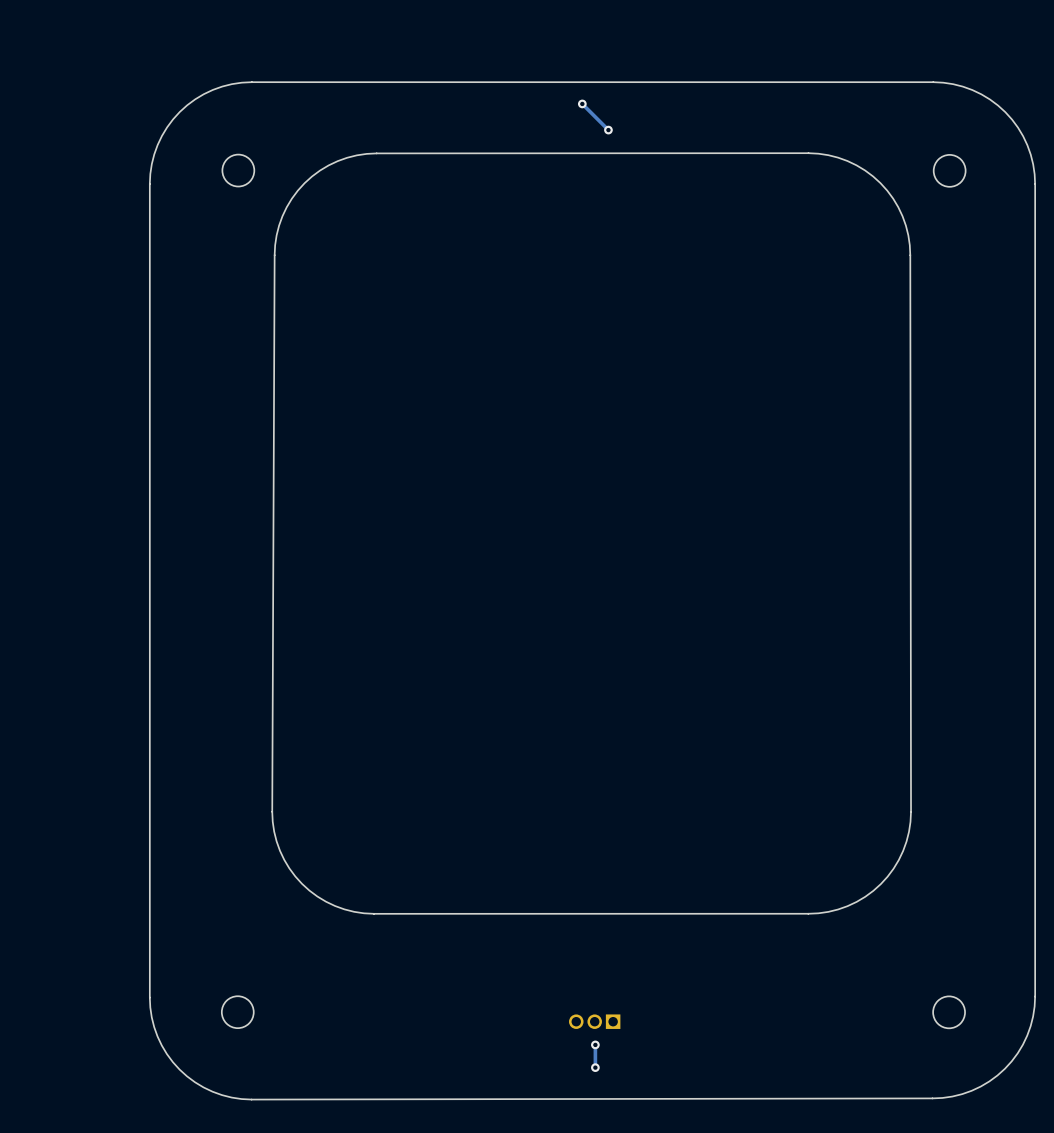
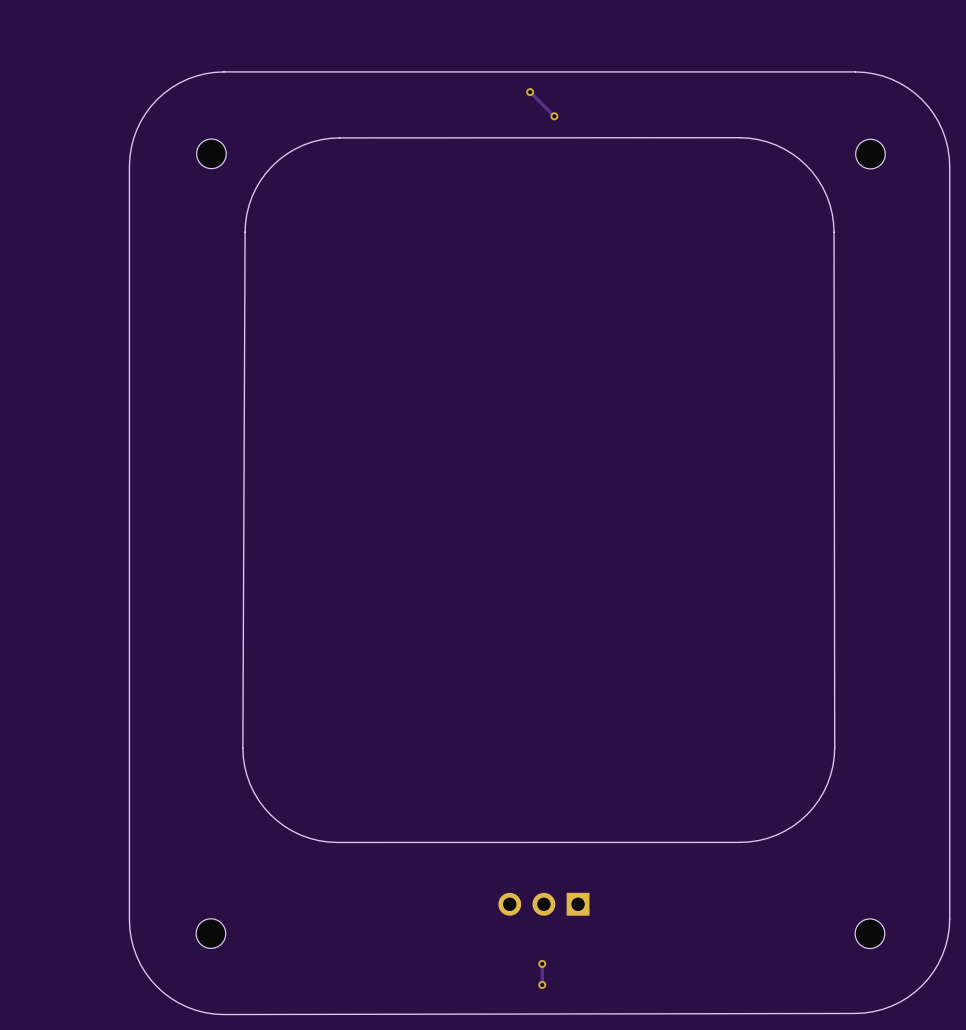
part: none -> (543, 904)
part: (594, 1021) -> none

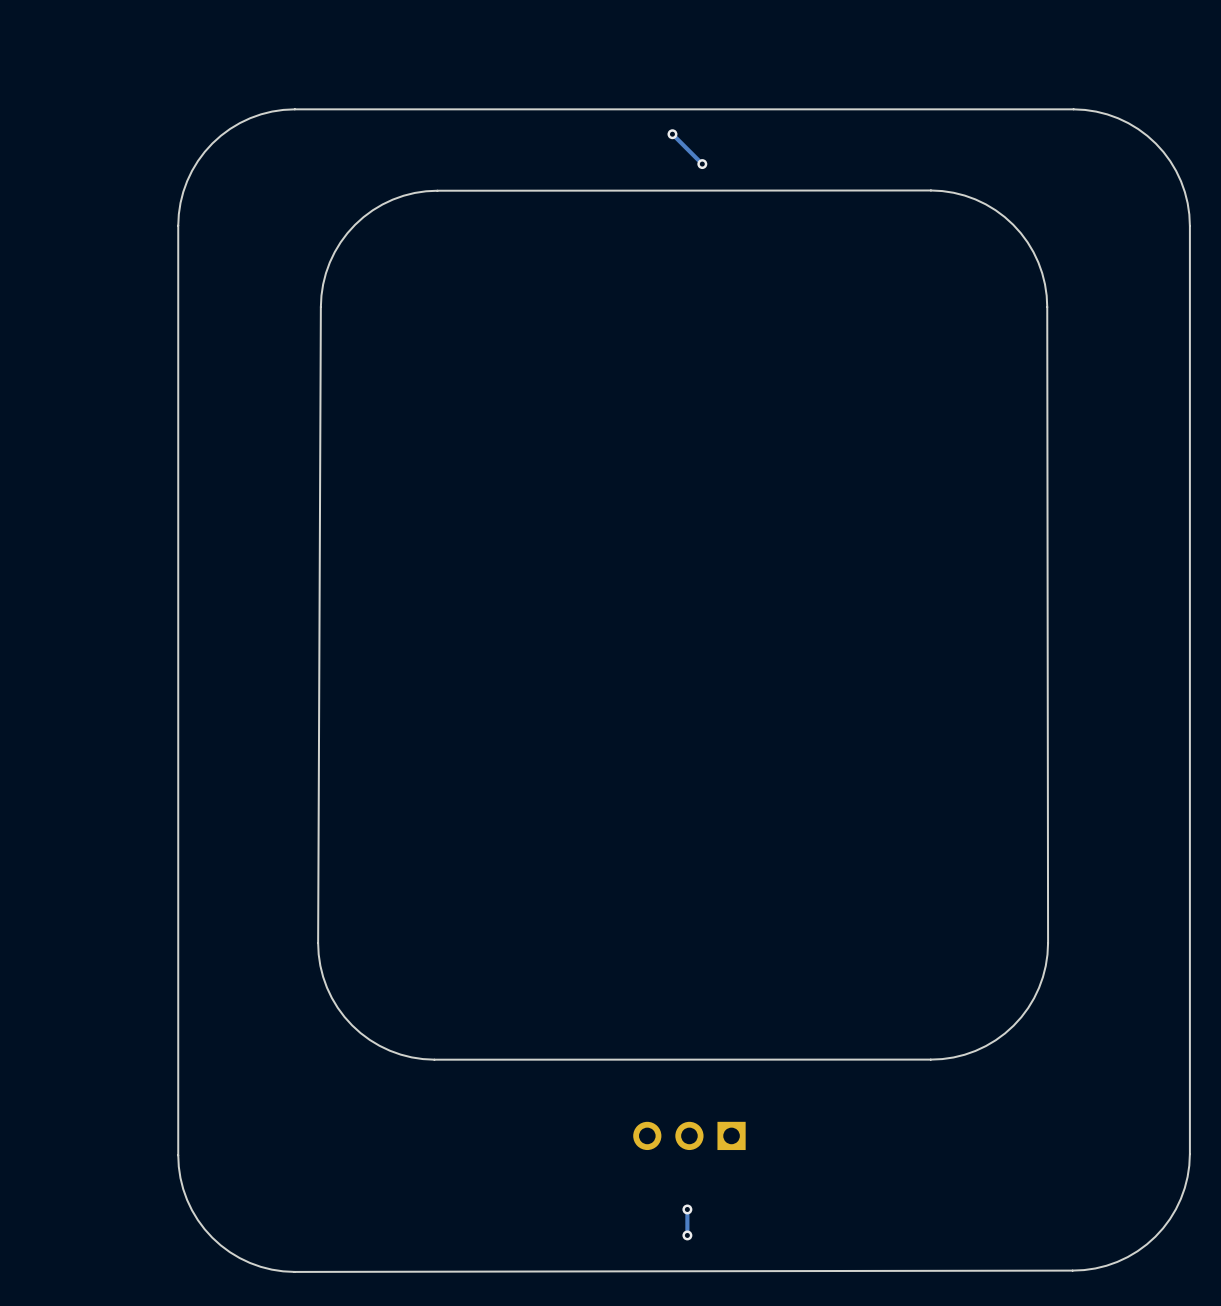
part: (211, 153) -> none
part: (870, 154) -> none
part: (210, 933) -> none
part: (869, 933) -> none

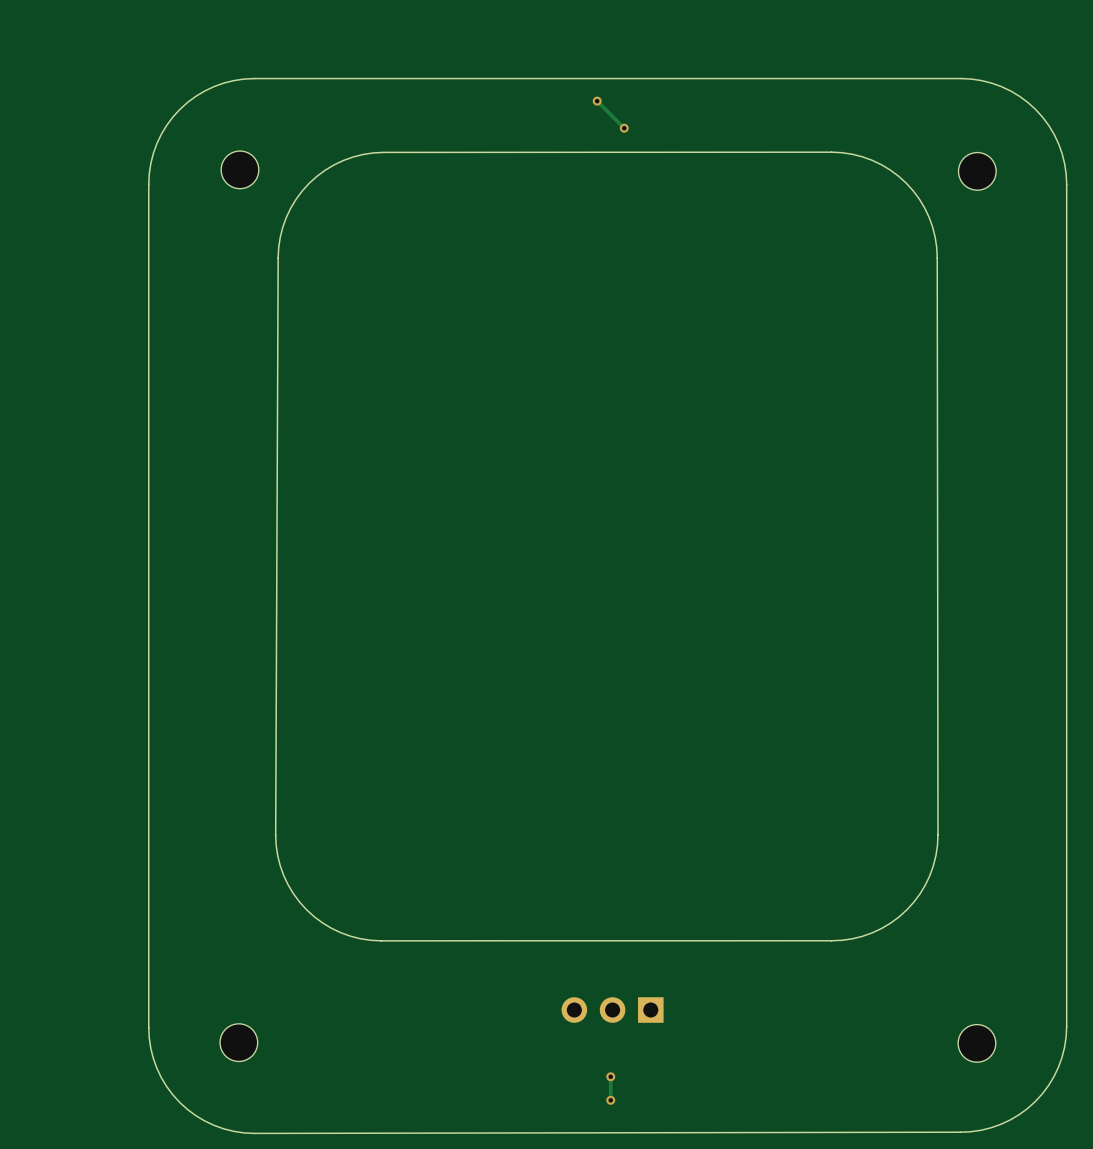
part: none -> (239, 169)
part: none -> (977, 171)
part: none -> (238, 1042)
part: none -> (976, 1043)

